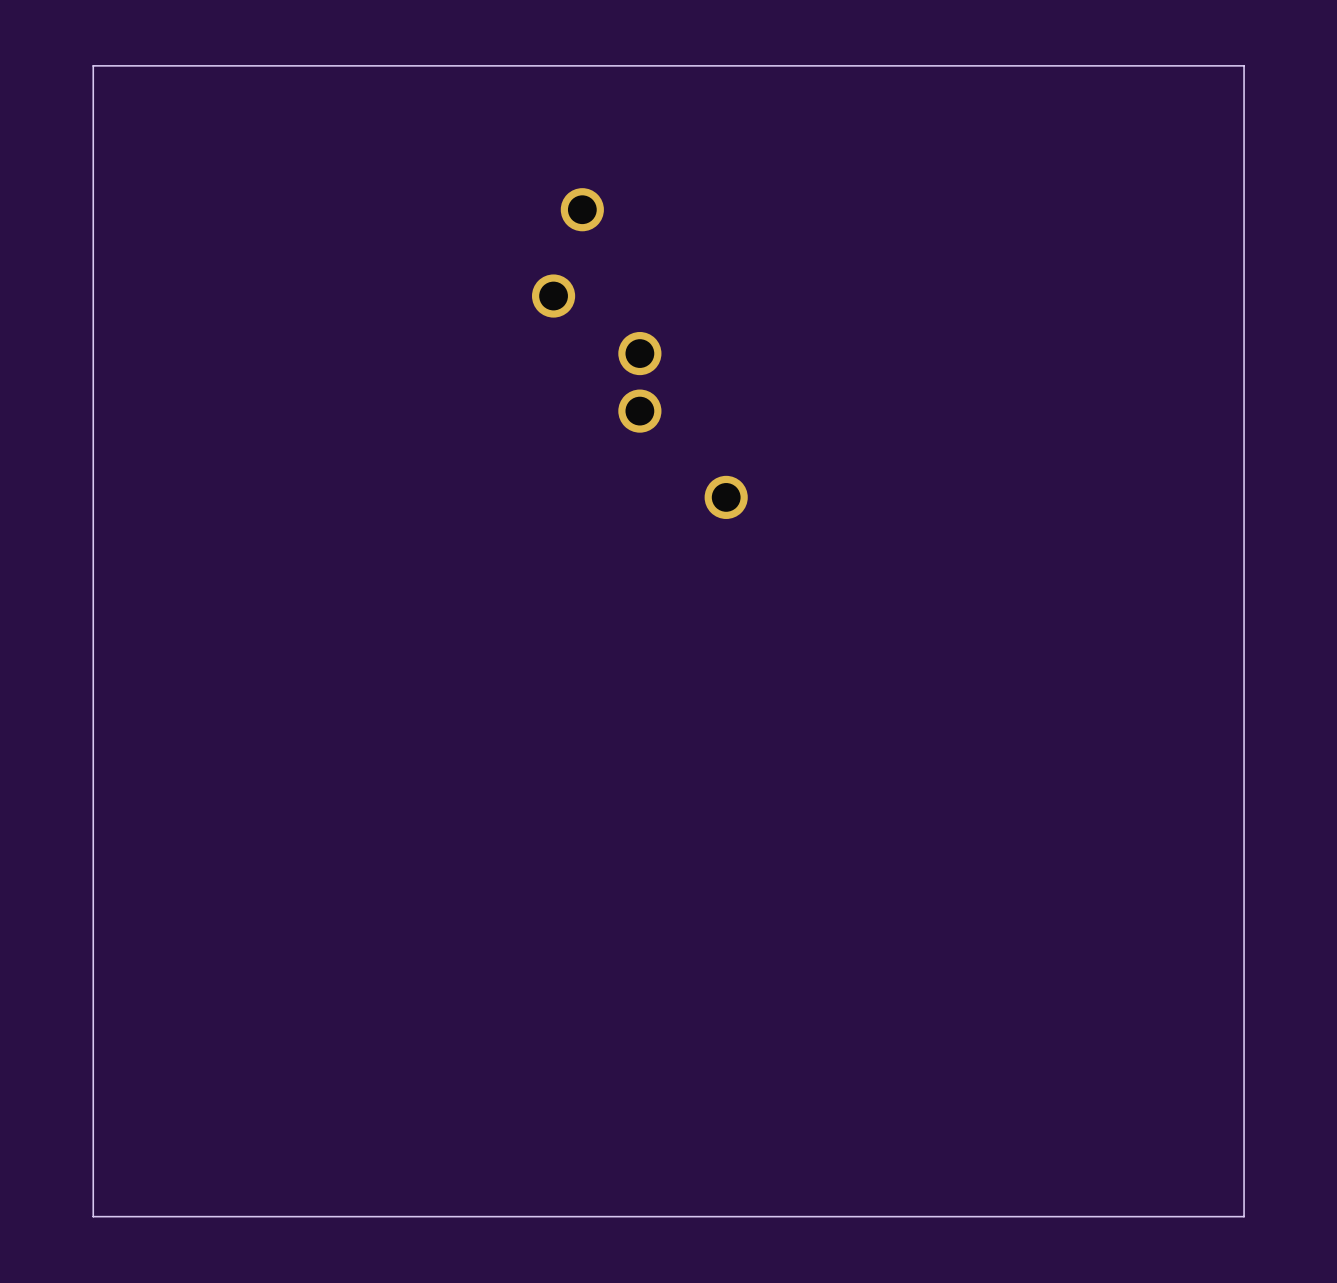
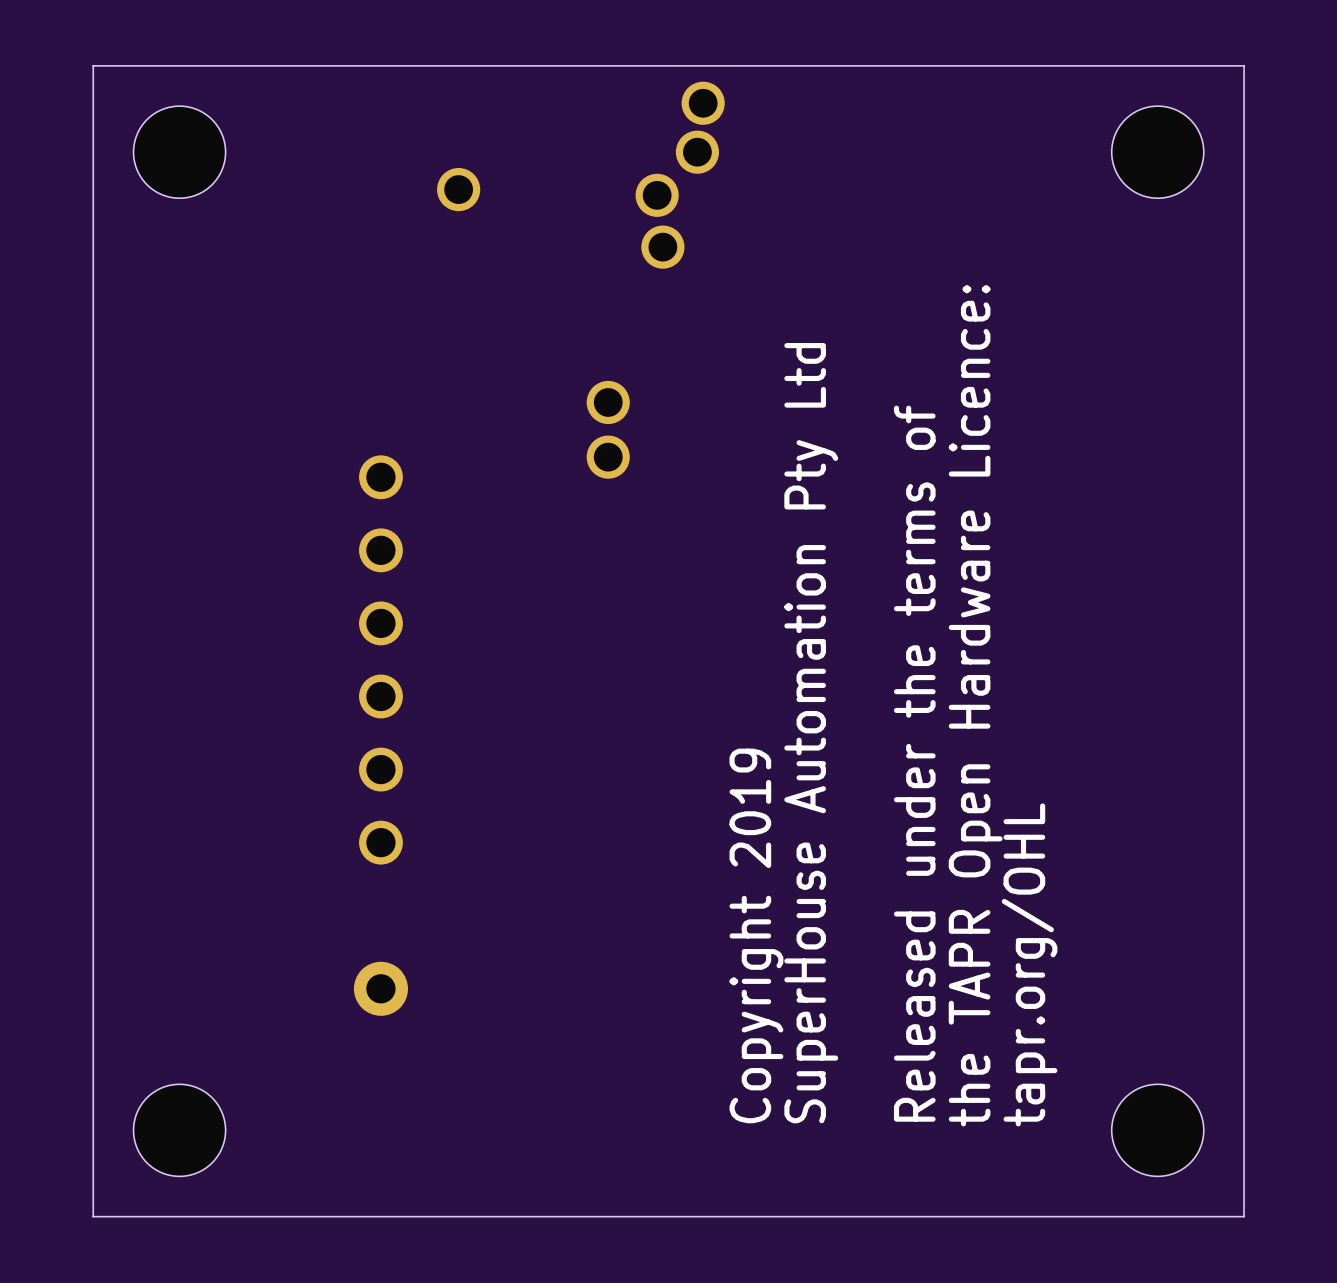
part: none -> (703, 103)
hole: none -> (179, 152)
part: none -> (697, 152)
hole: none -> (1157, 152)
part: none -> (458, 189)
part: none -> (657, 195)
part: (582, 209) -> none
part: none -> (662, 247)
part: (553, 296) -> none
part: (639, 353) -> none
part: none -> (608, 402)
part: (639, 411) -> none
part: none -> (608, 457)
part: (726, 497) -> none
part: none -> (380, 659)
text: none -> the TAPR Open Hardware Licence: (975, 705)
text: none -> SuperHouse Automation Pty Ltd (811, 733)
text: none -> Released under the terms of (914, 763)
text: none -> Copyright 2019 (756, 935)
text: none -> tapr.org/OHL (1029, 964)
part: none -> (380, 988)
hole: none -> (179, 1130)
hole: none -> (1157, 1130)

